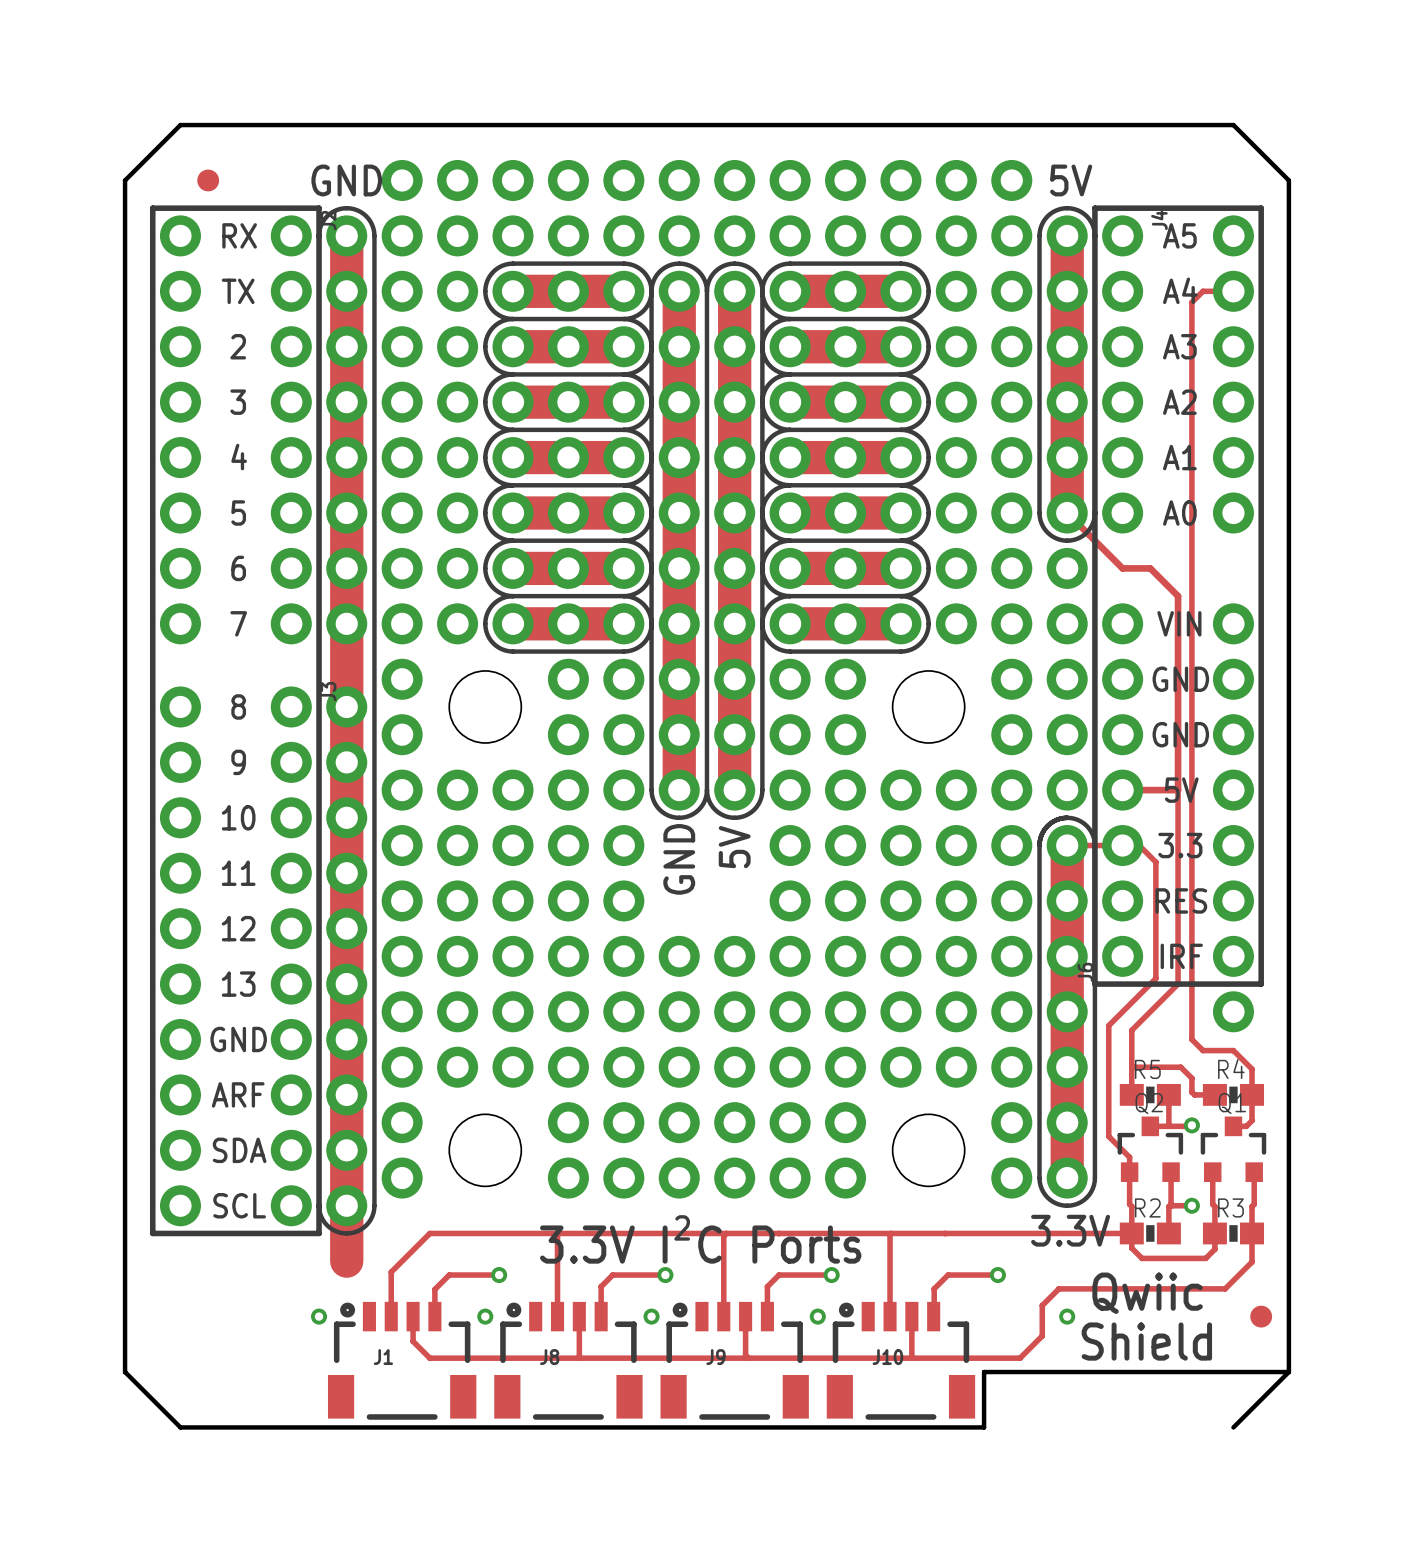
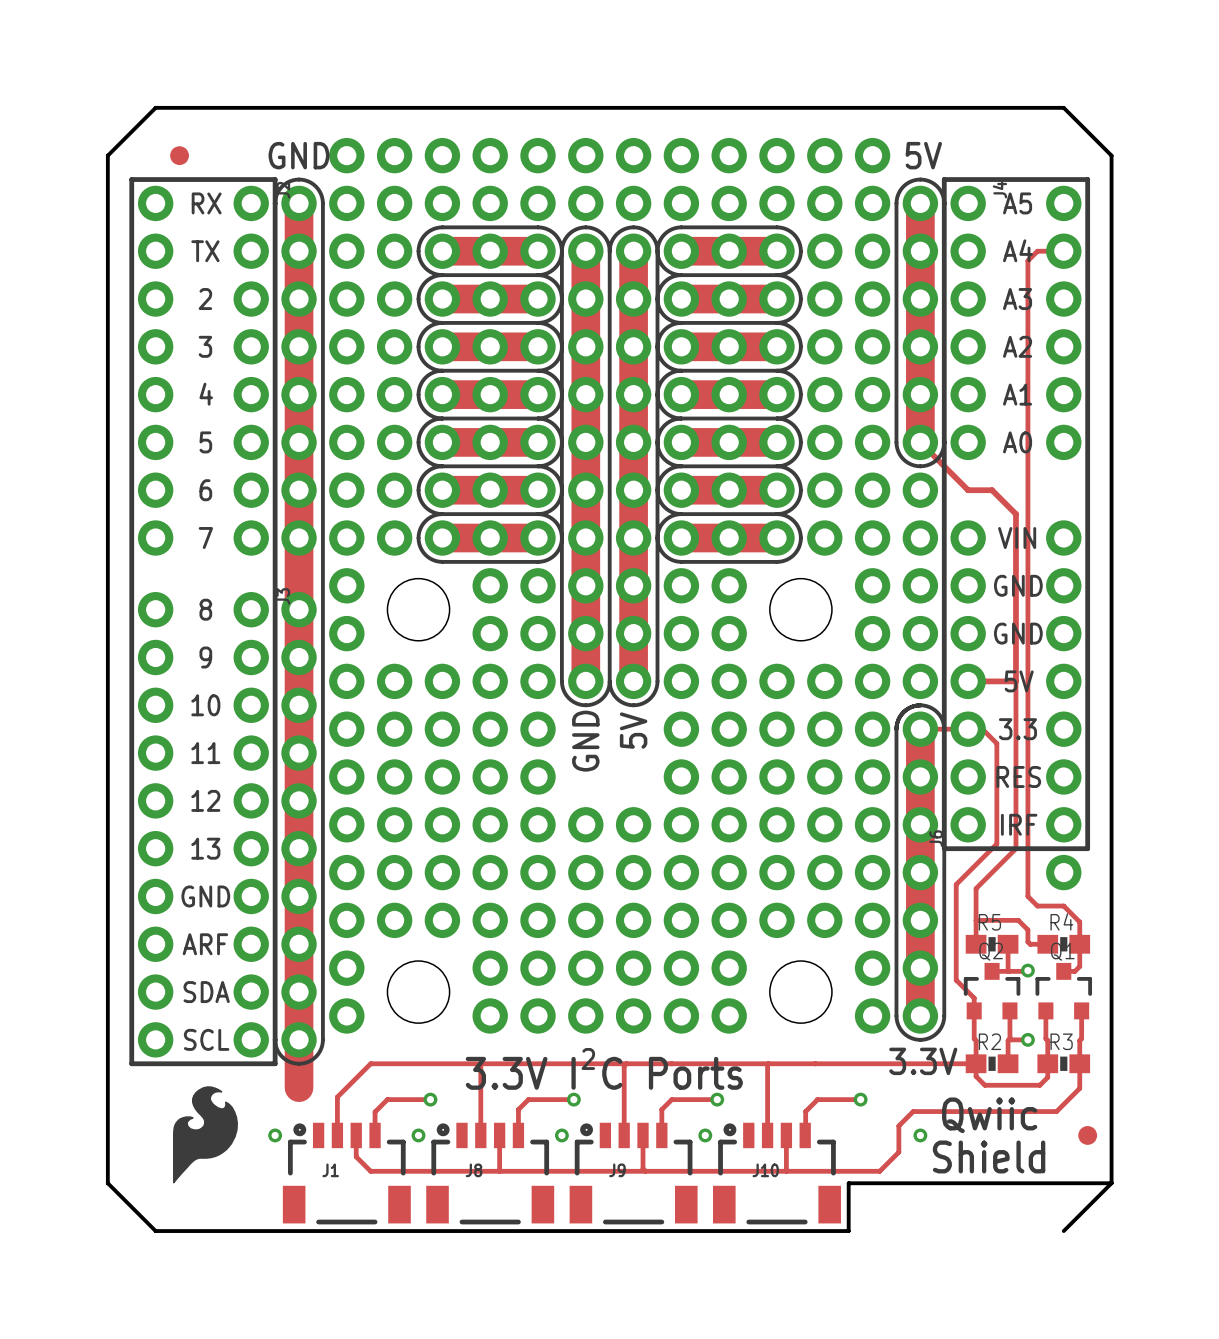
drawing: none -> [172, 1086, 239, 1184]

